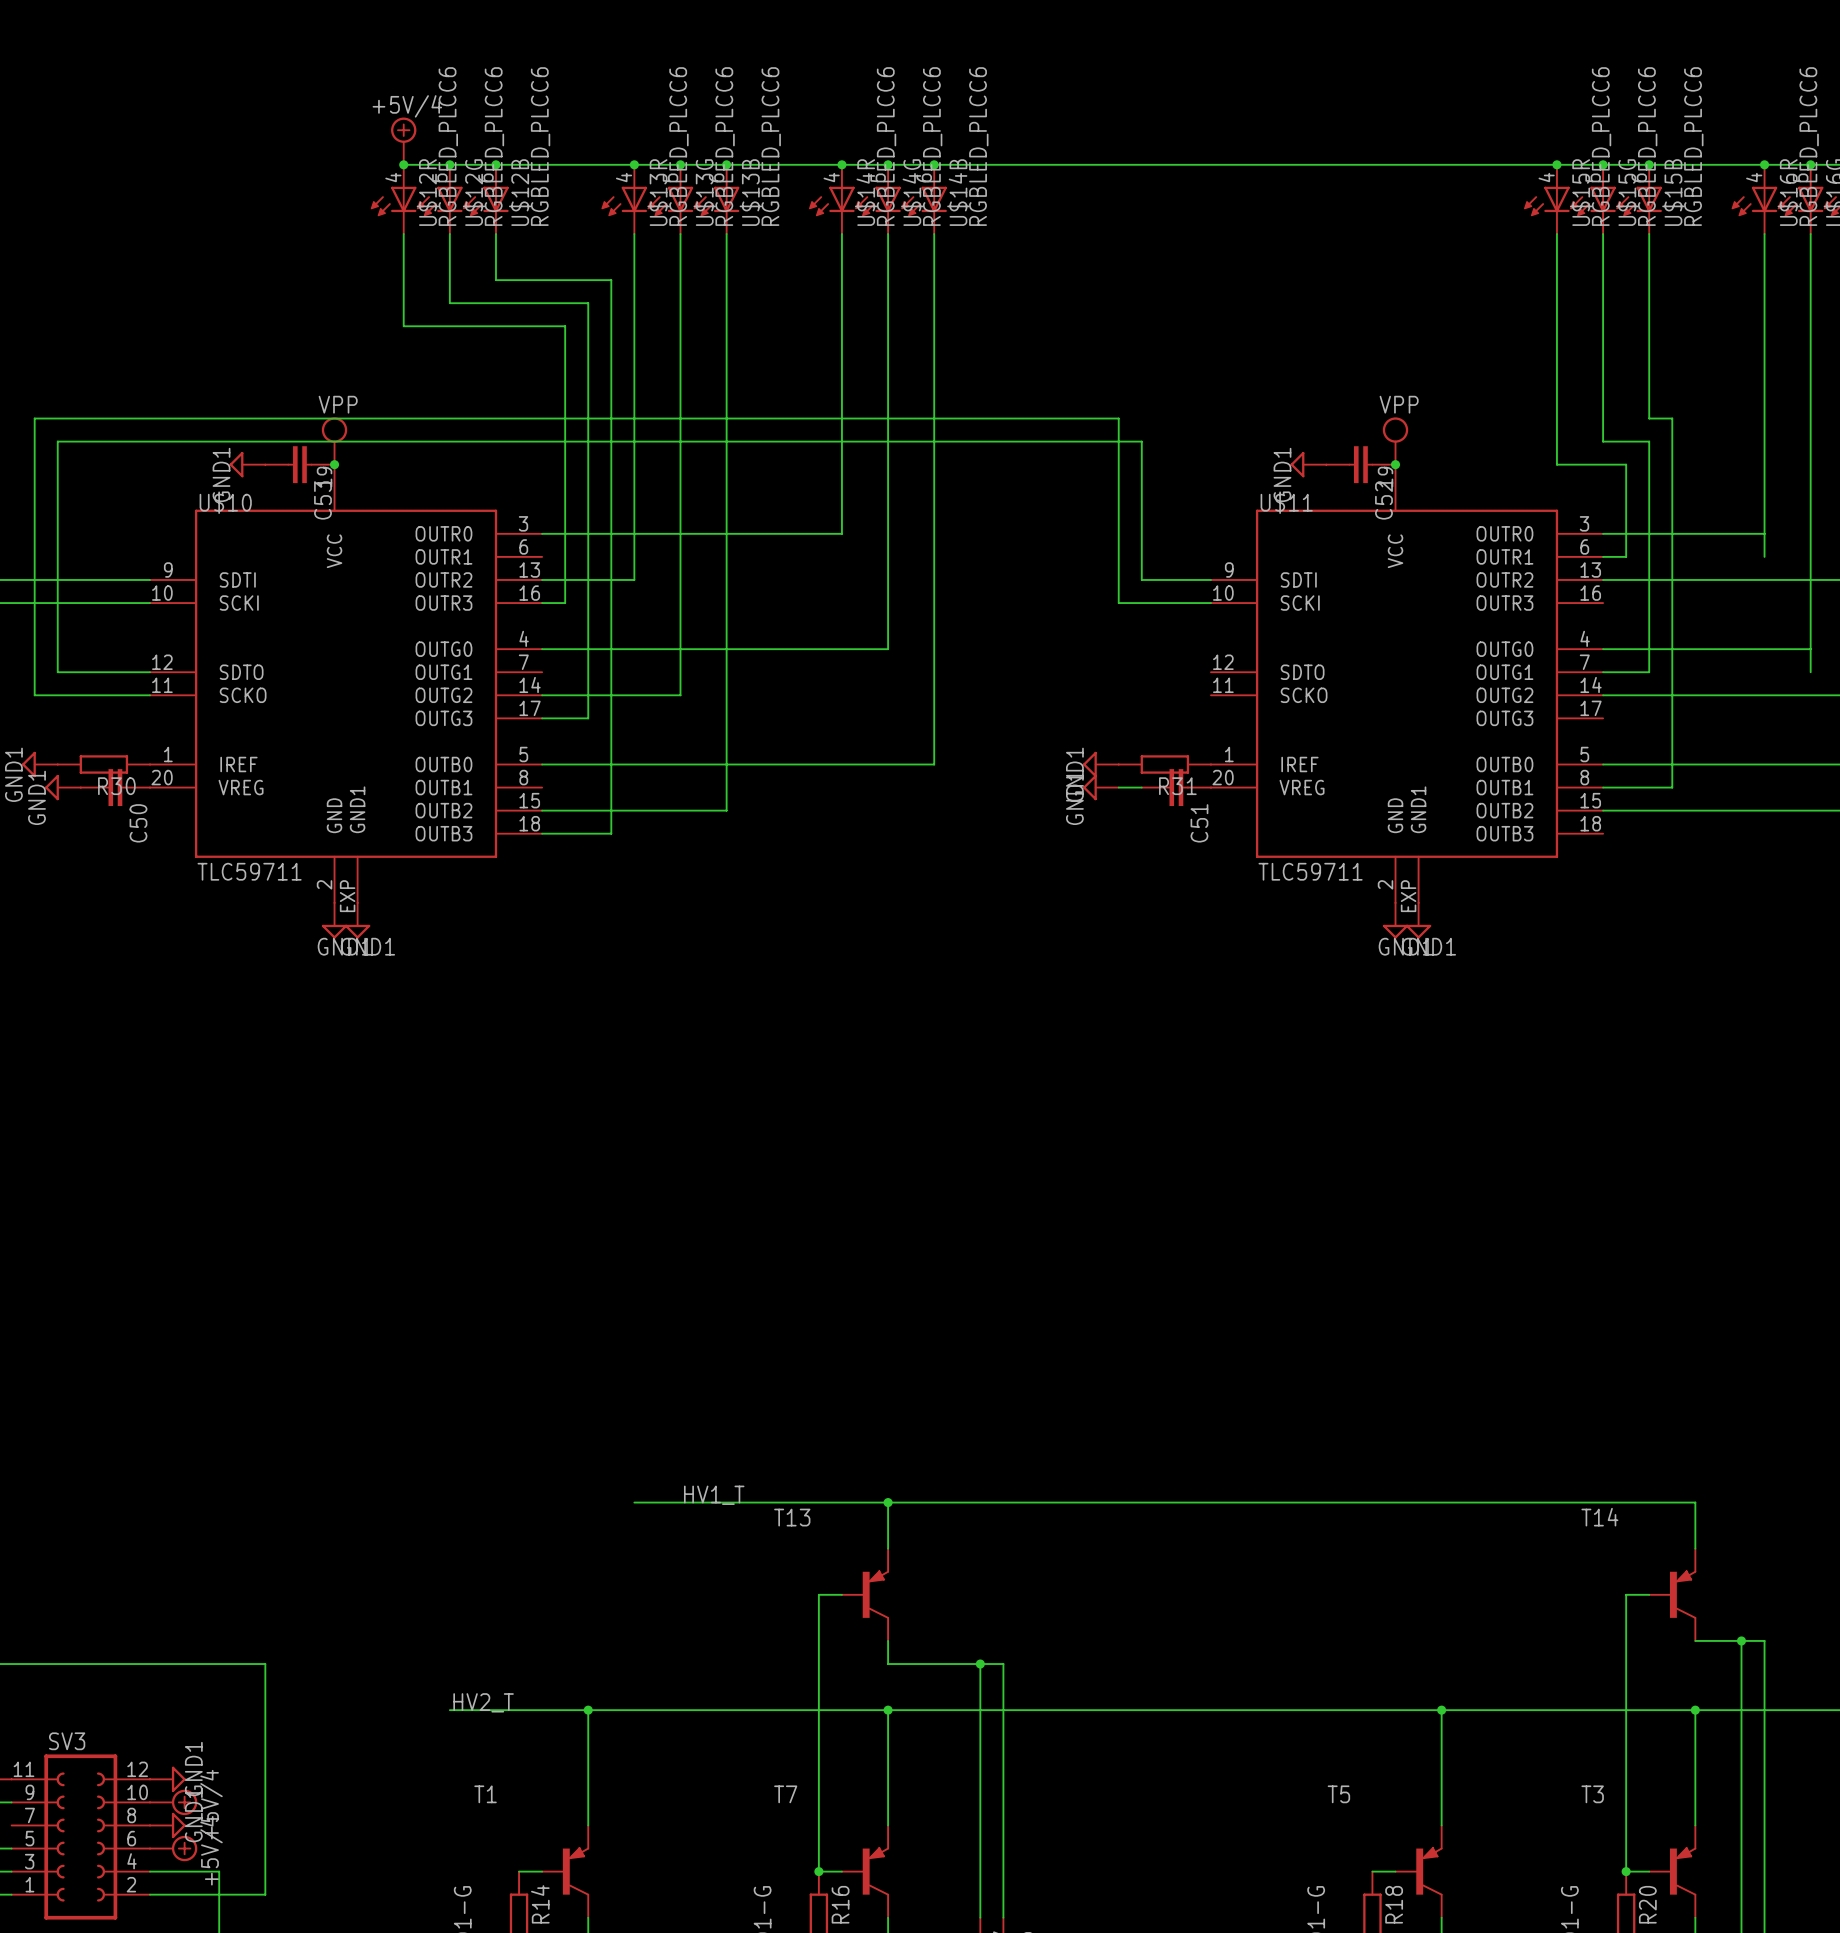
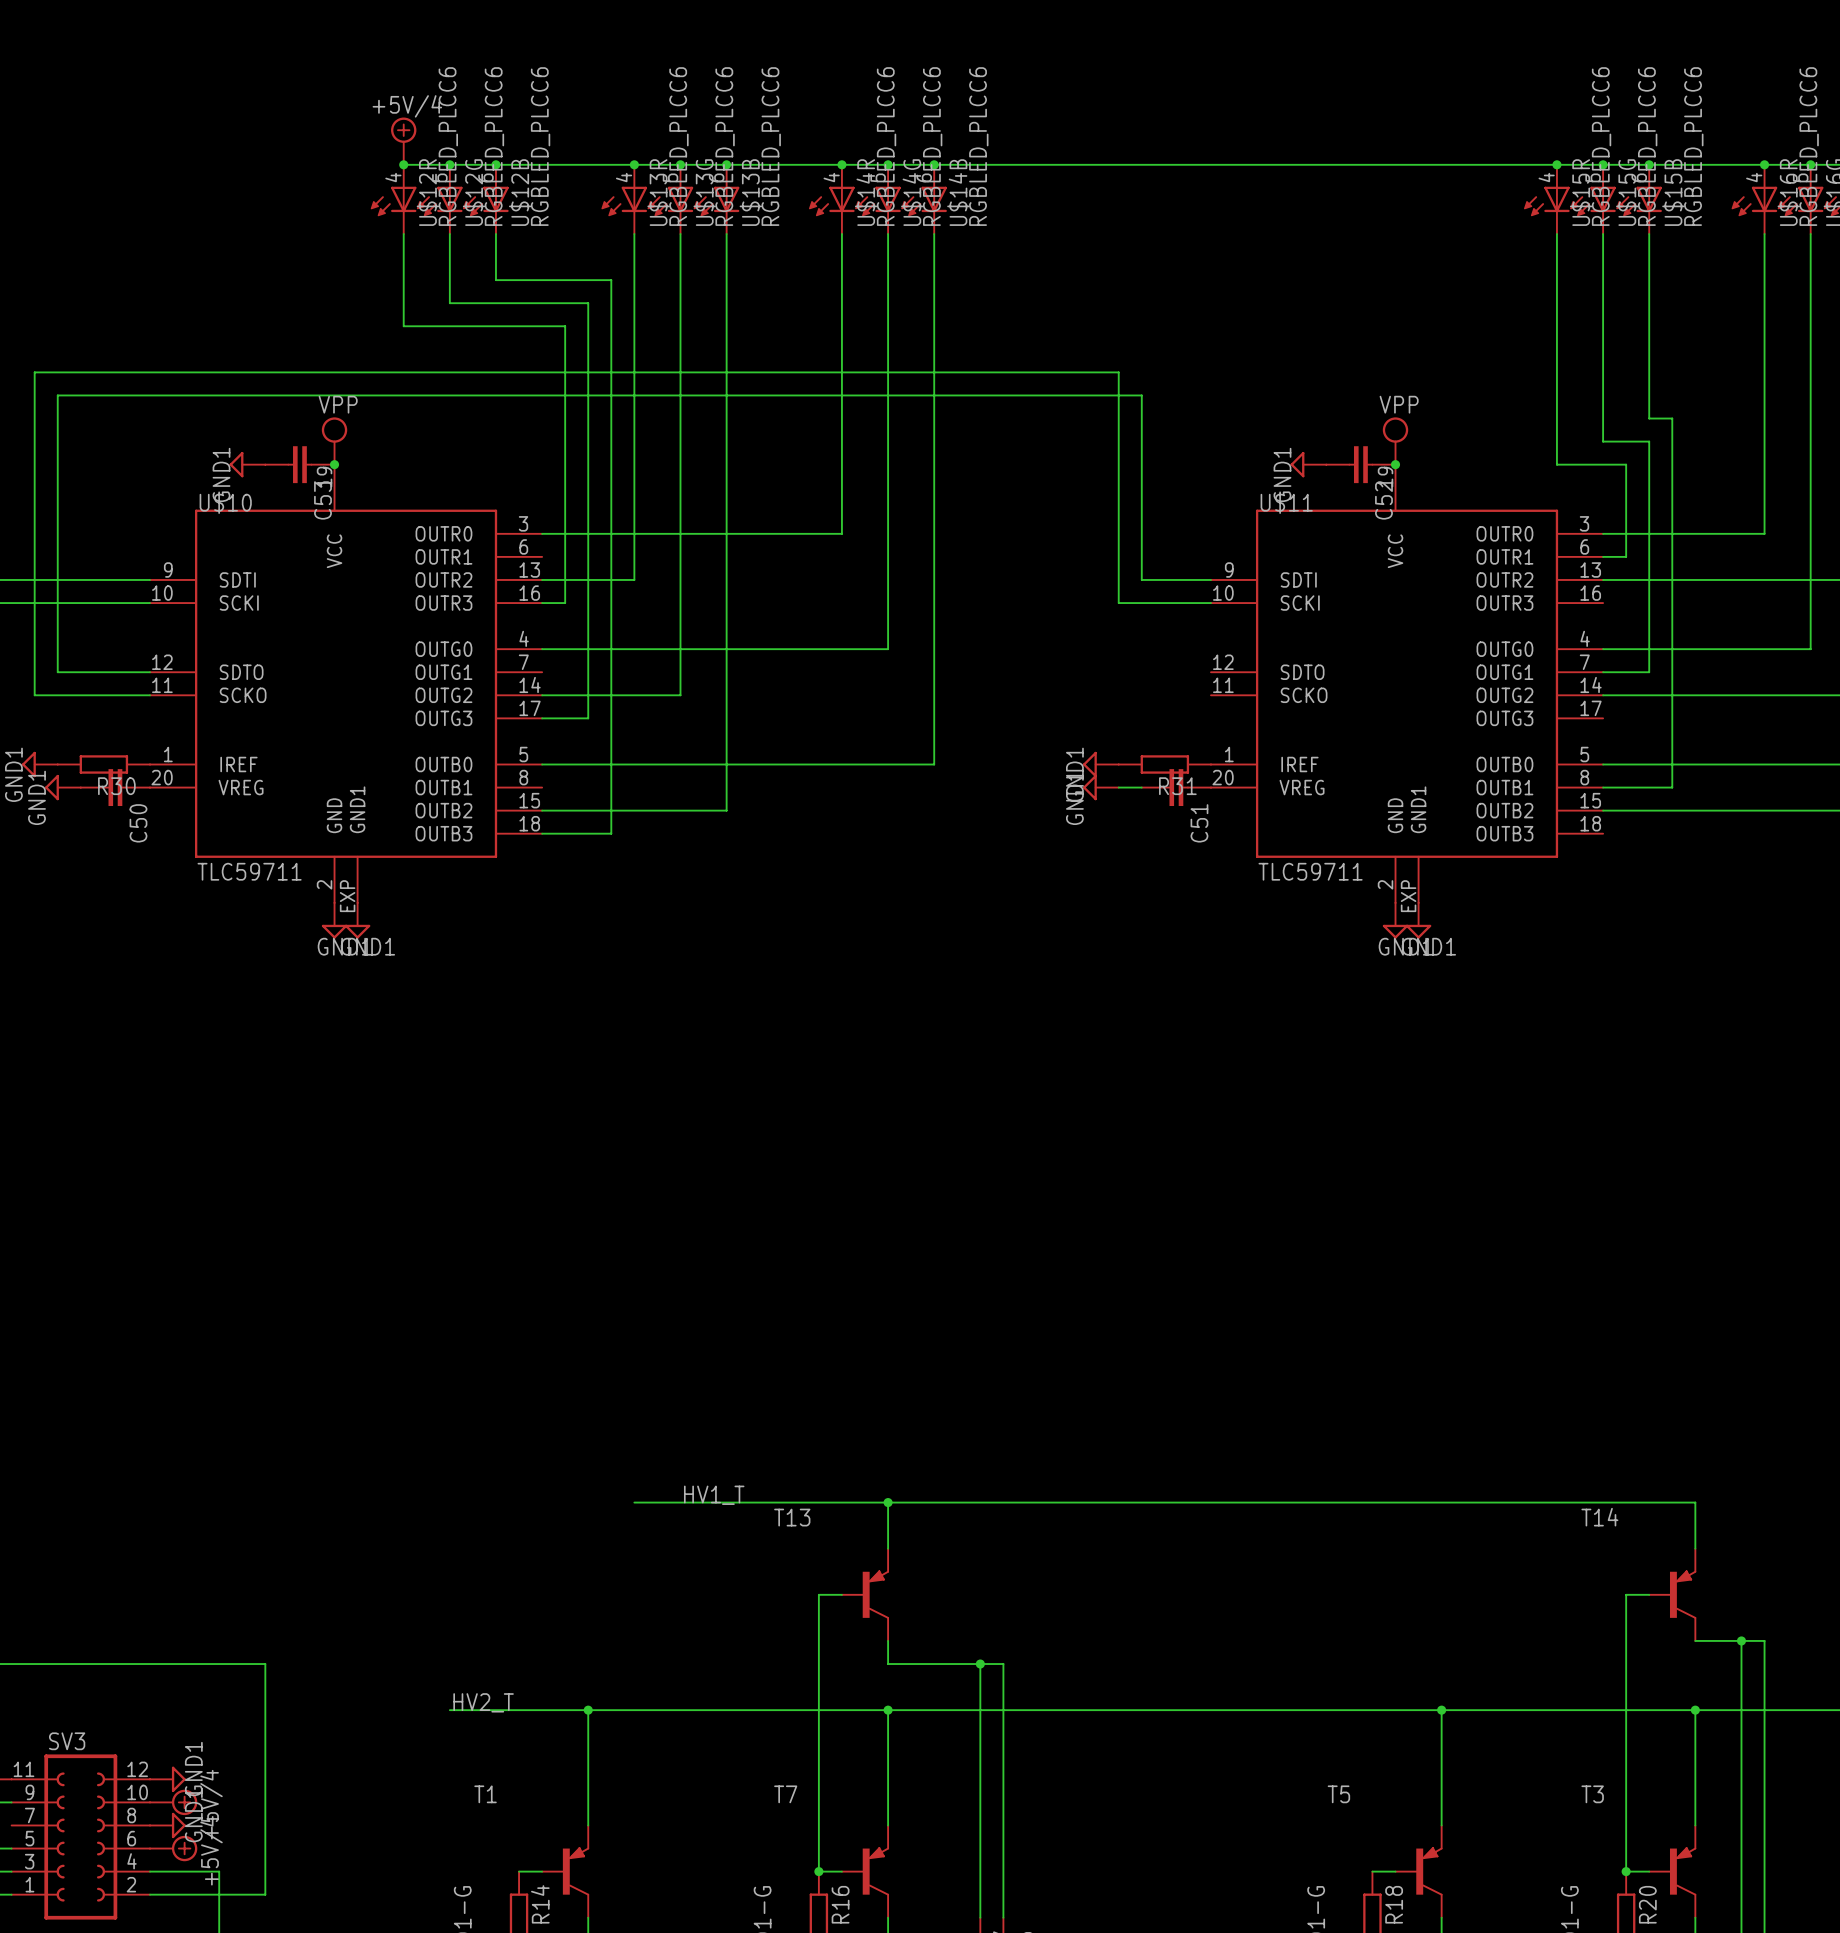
wire: (34, 418) (1118, 418) -> (34, 418) (34, 372) (1118, 372) (1118, 418)
wire: (57, 441) (1141, 441) -> (57, 441) (57, 395) (1141, 395) (1141, 441)
wire: (1764, 533) (1764, 556) -> none
wire: (1810, 649) (1810, 672) -> none

